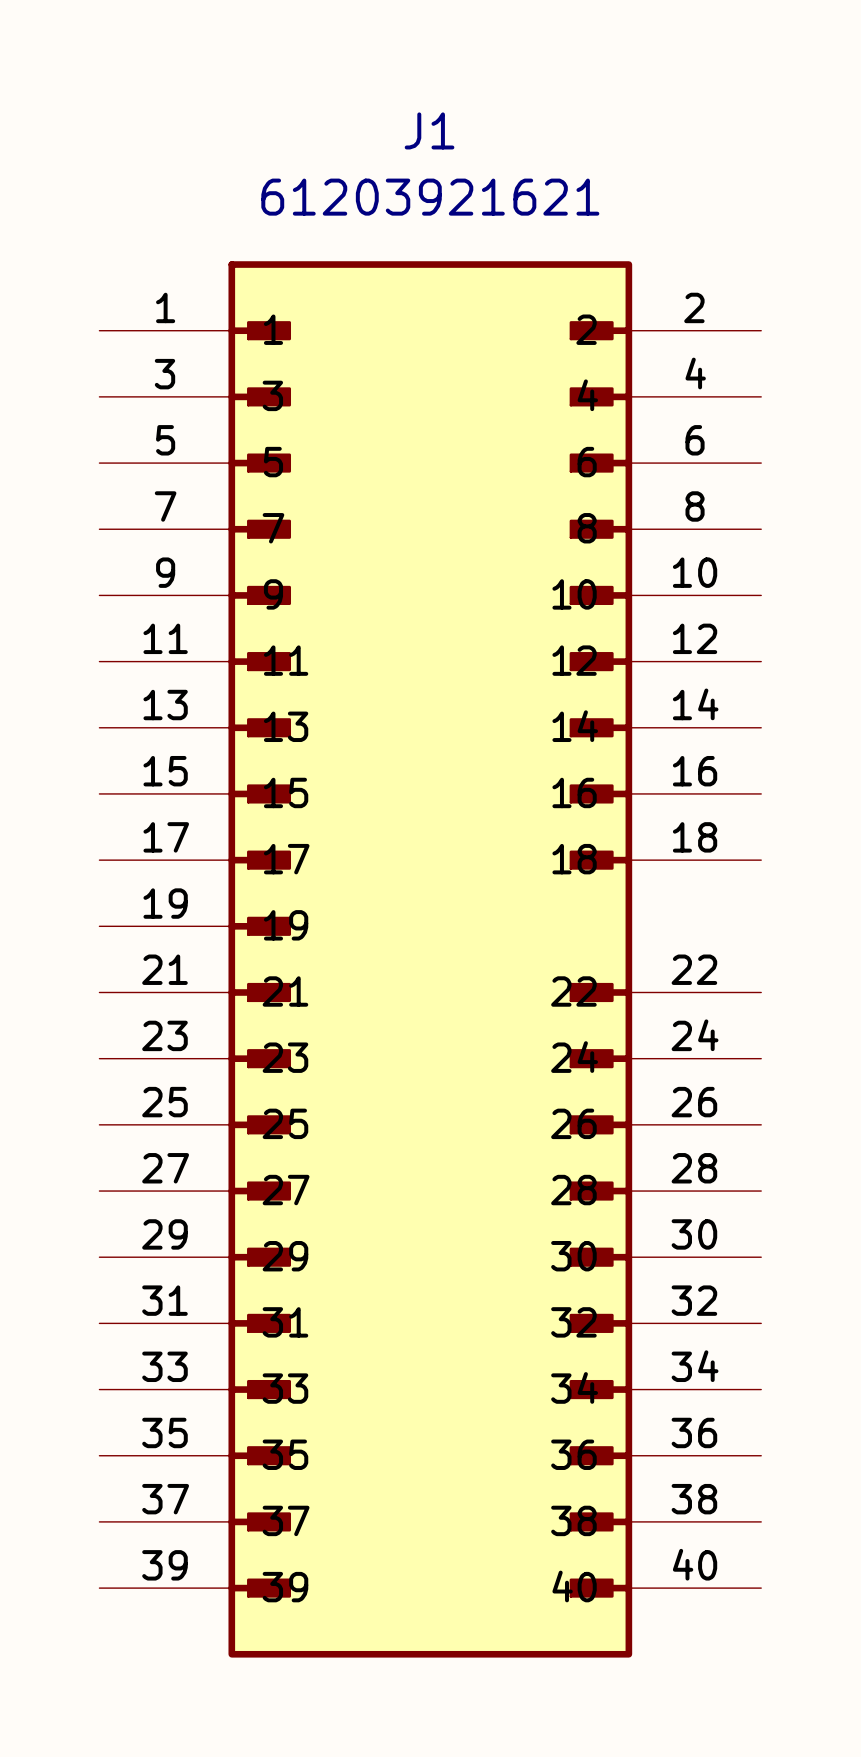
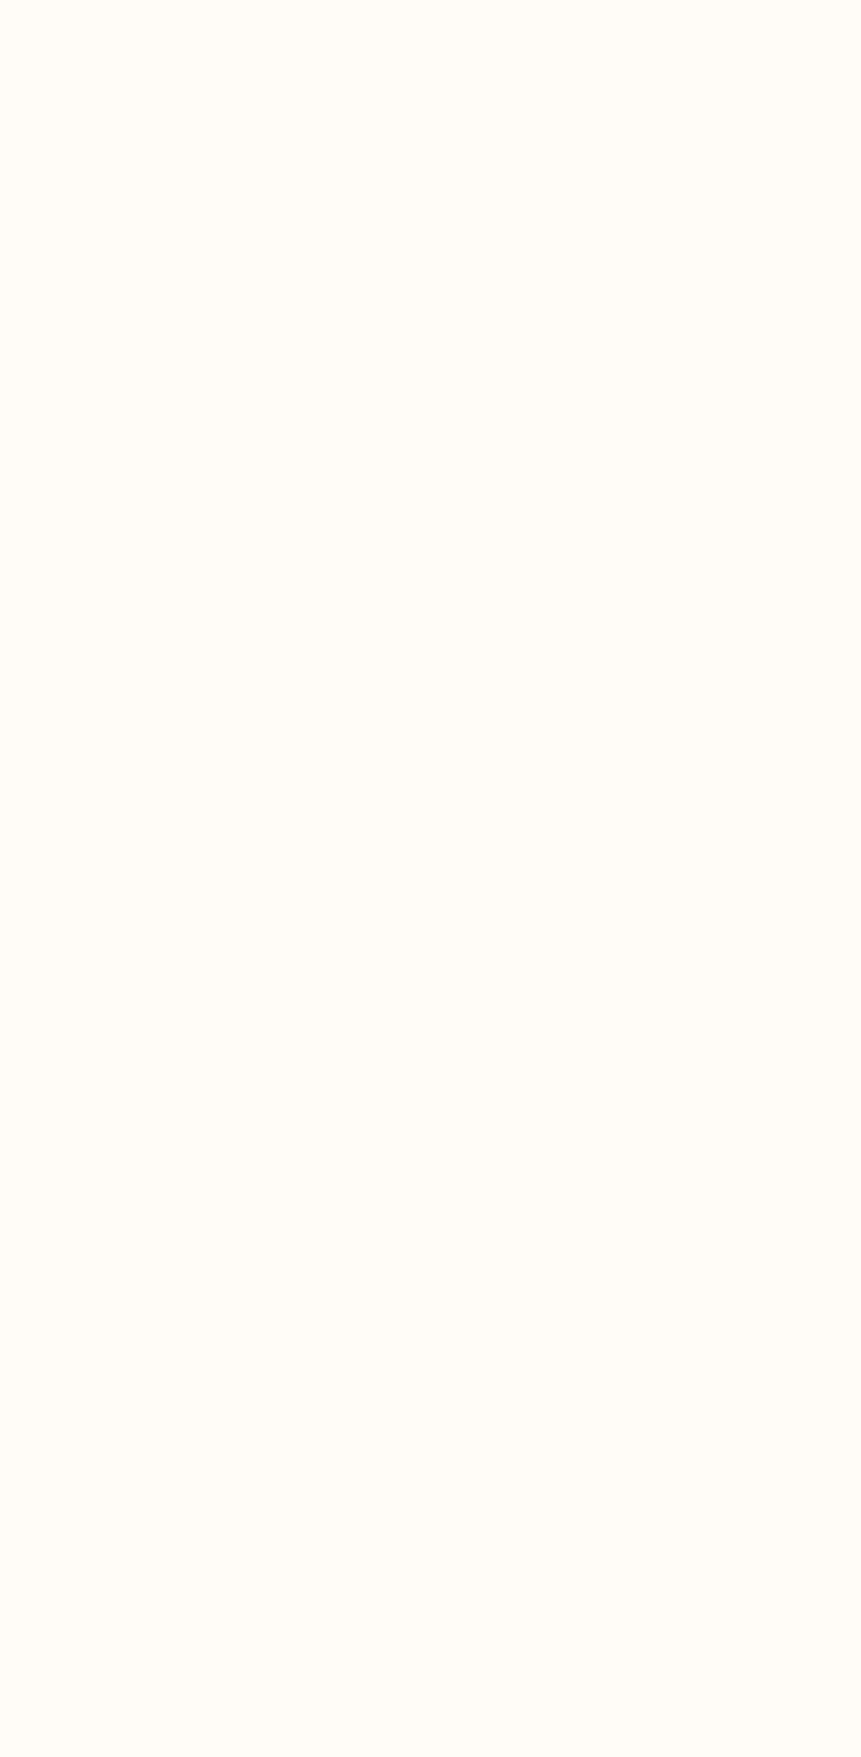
J1: 61203921621 (430, 959) -> none

